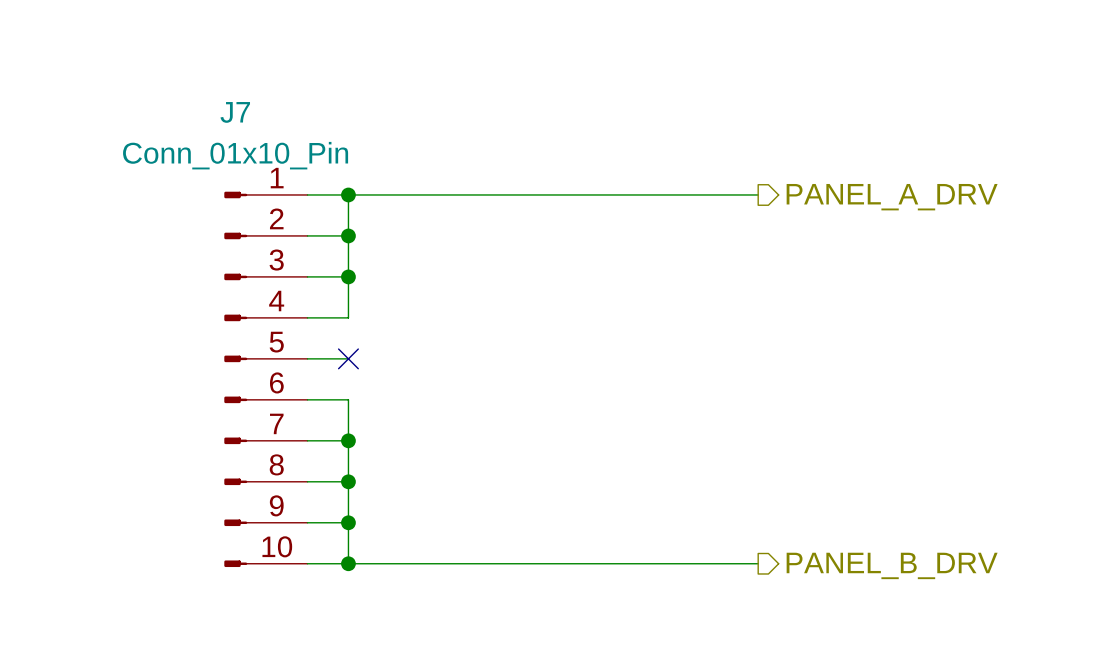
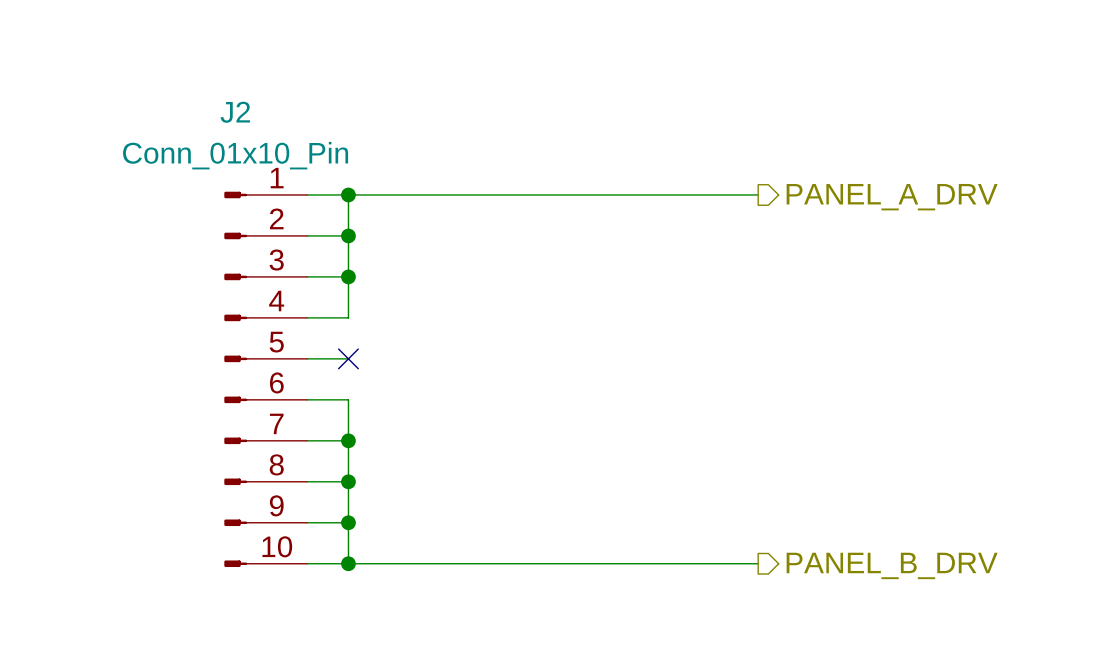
J7 name: J7 (235, 112) -> J2 (235, 112)

